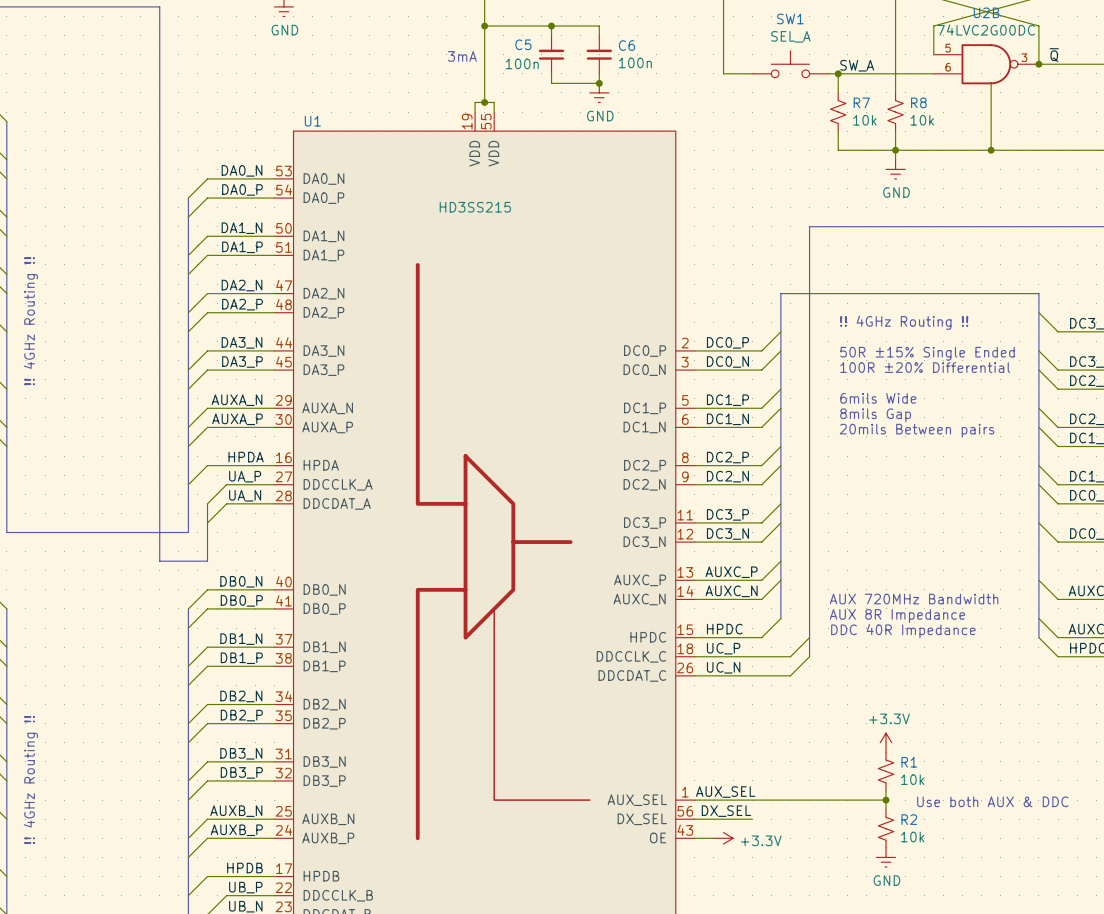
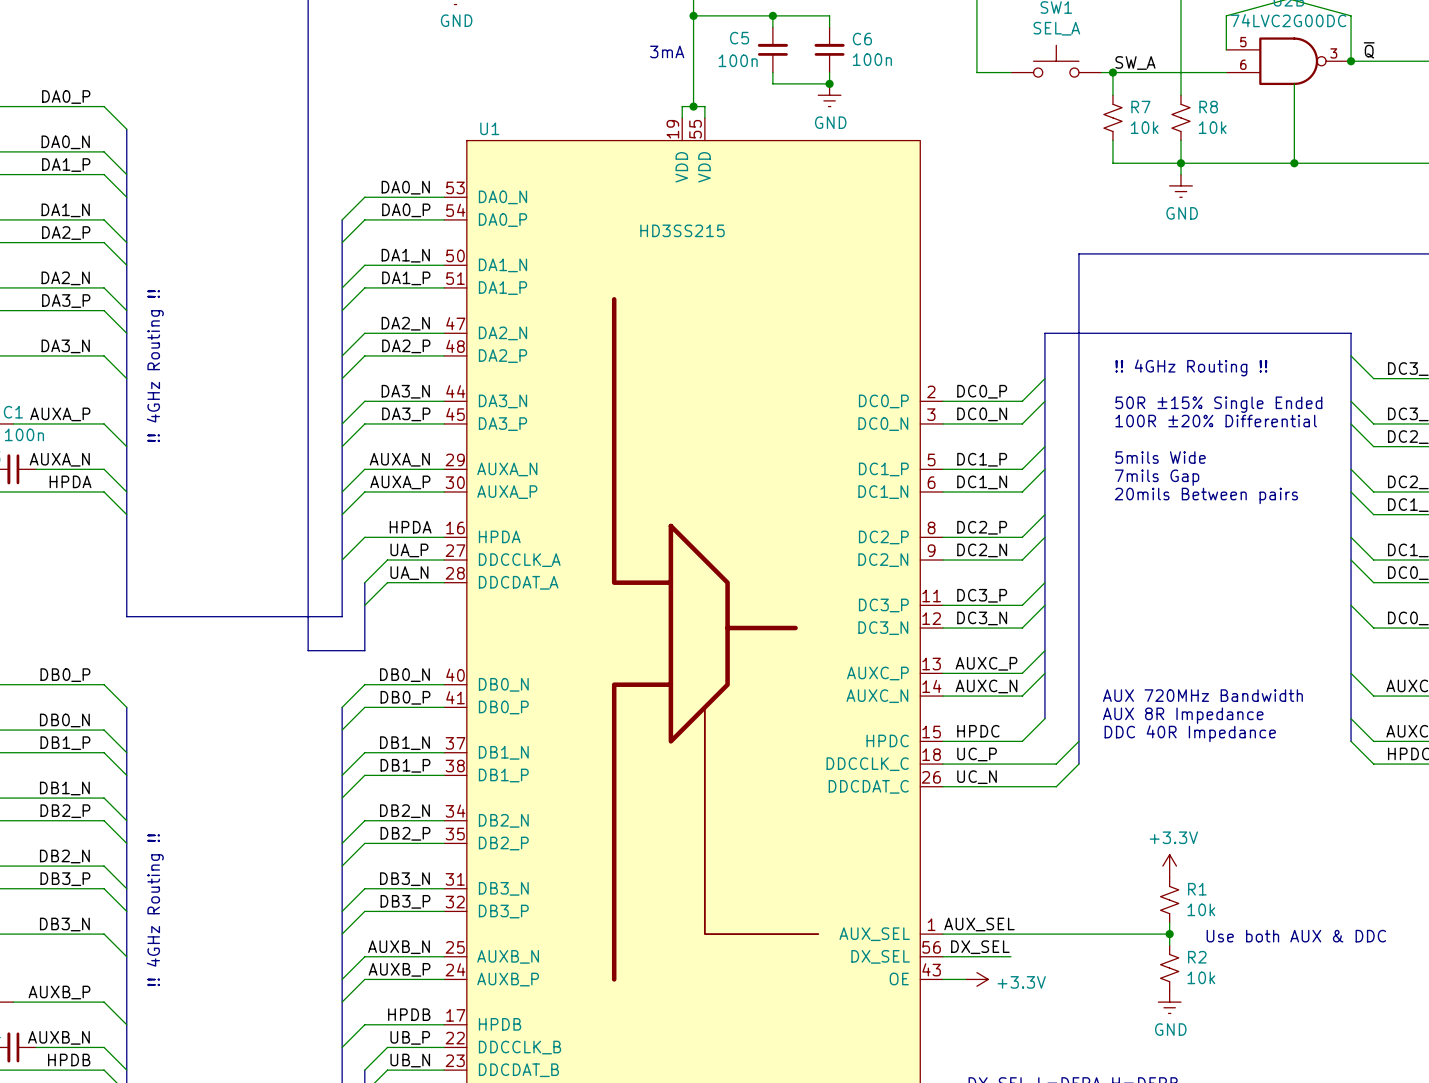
text: 6mils Wide (878, 398) -> 5mils Wide (1160, 457)
text: 8mils Gap (875, 415) -> 7mils Gap (1157, 477)

